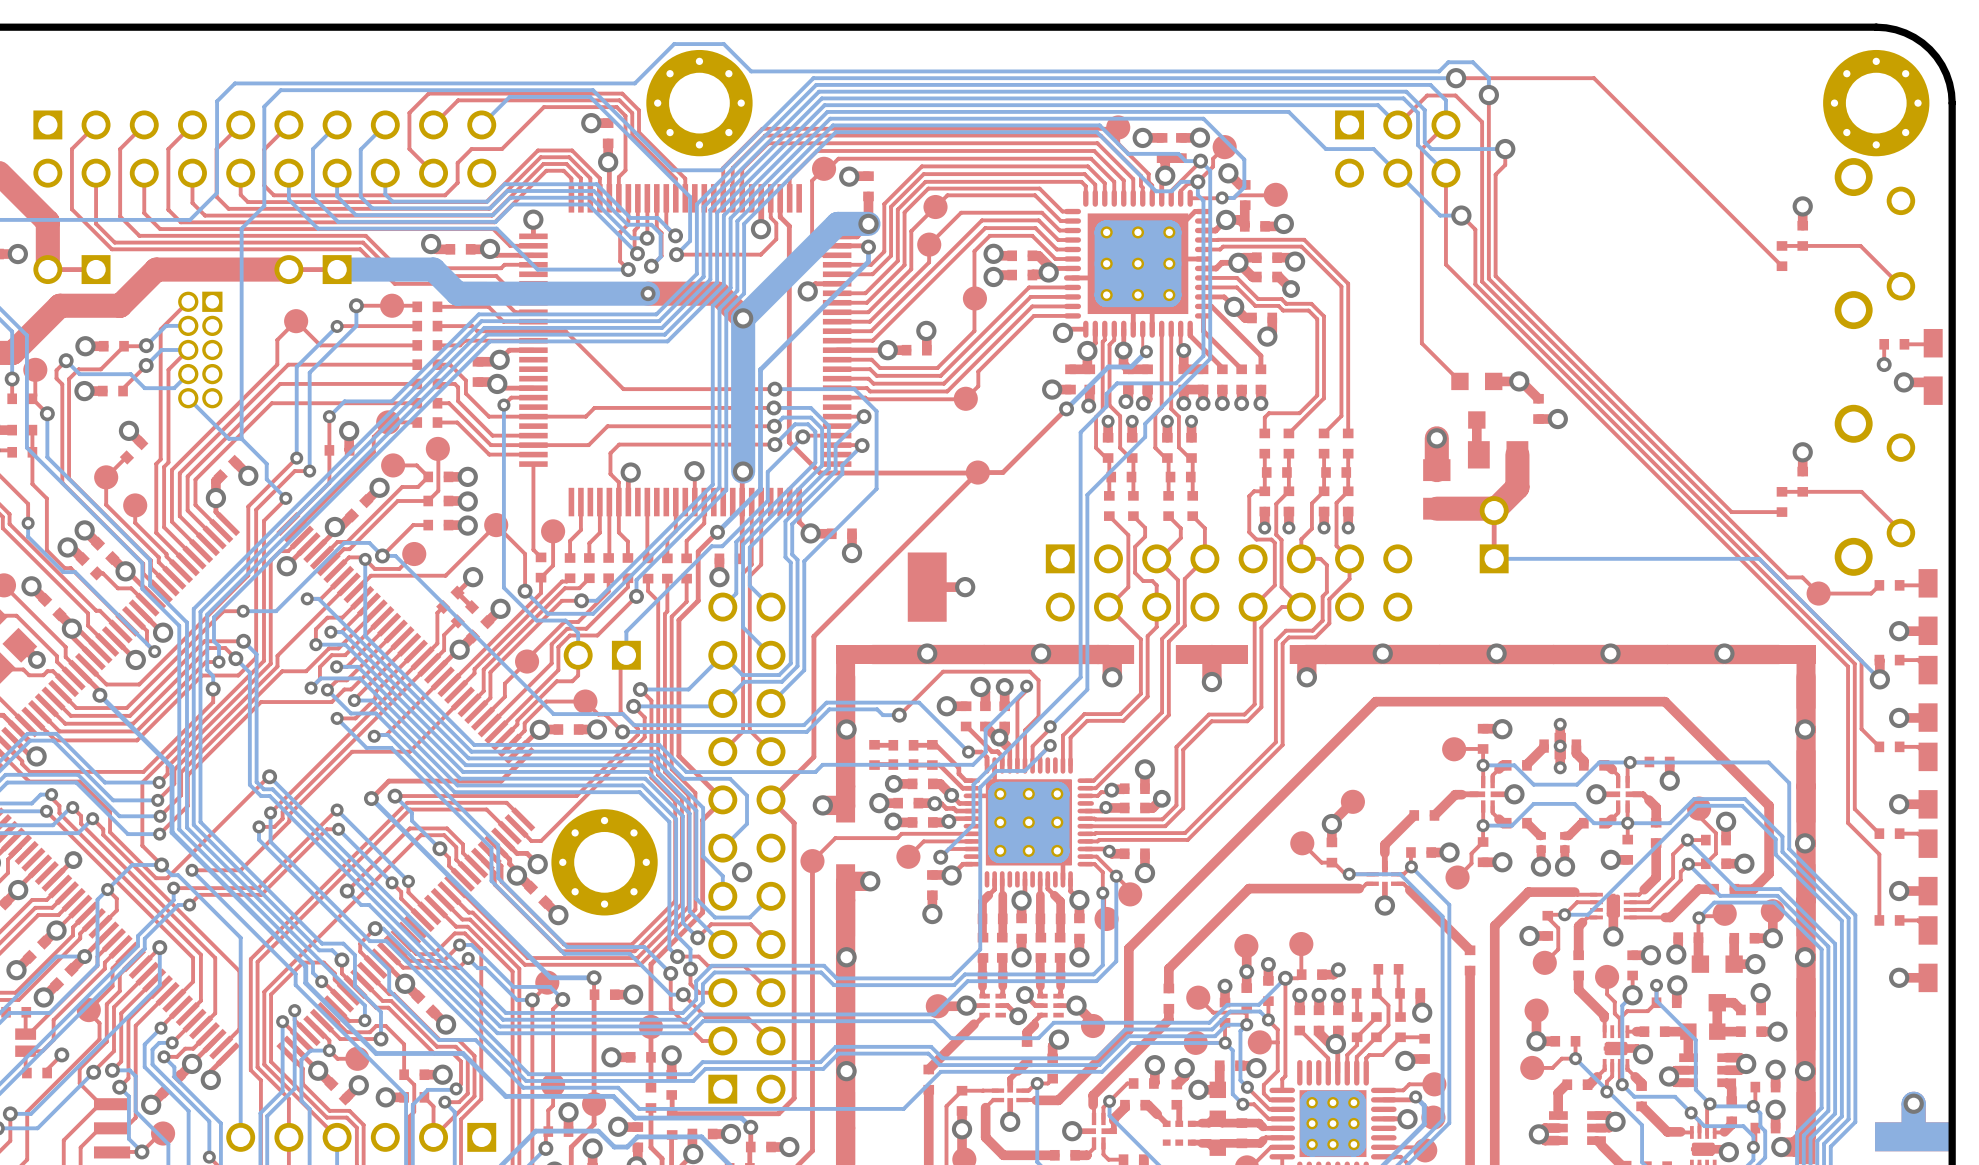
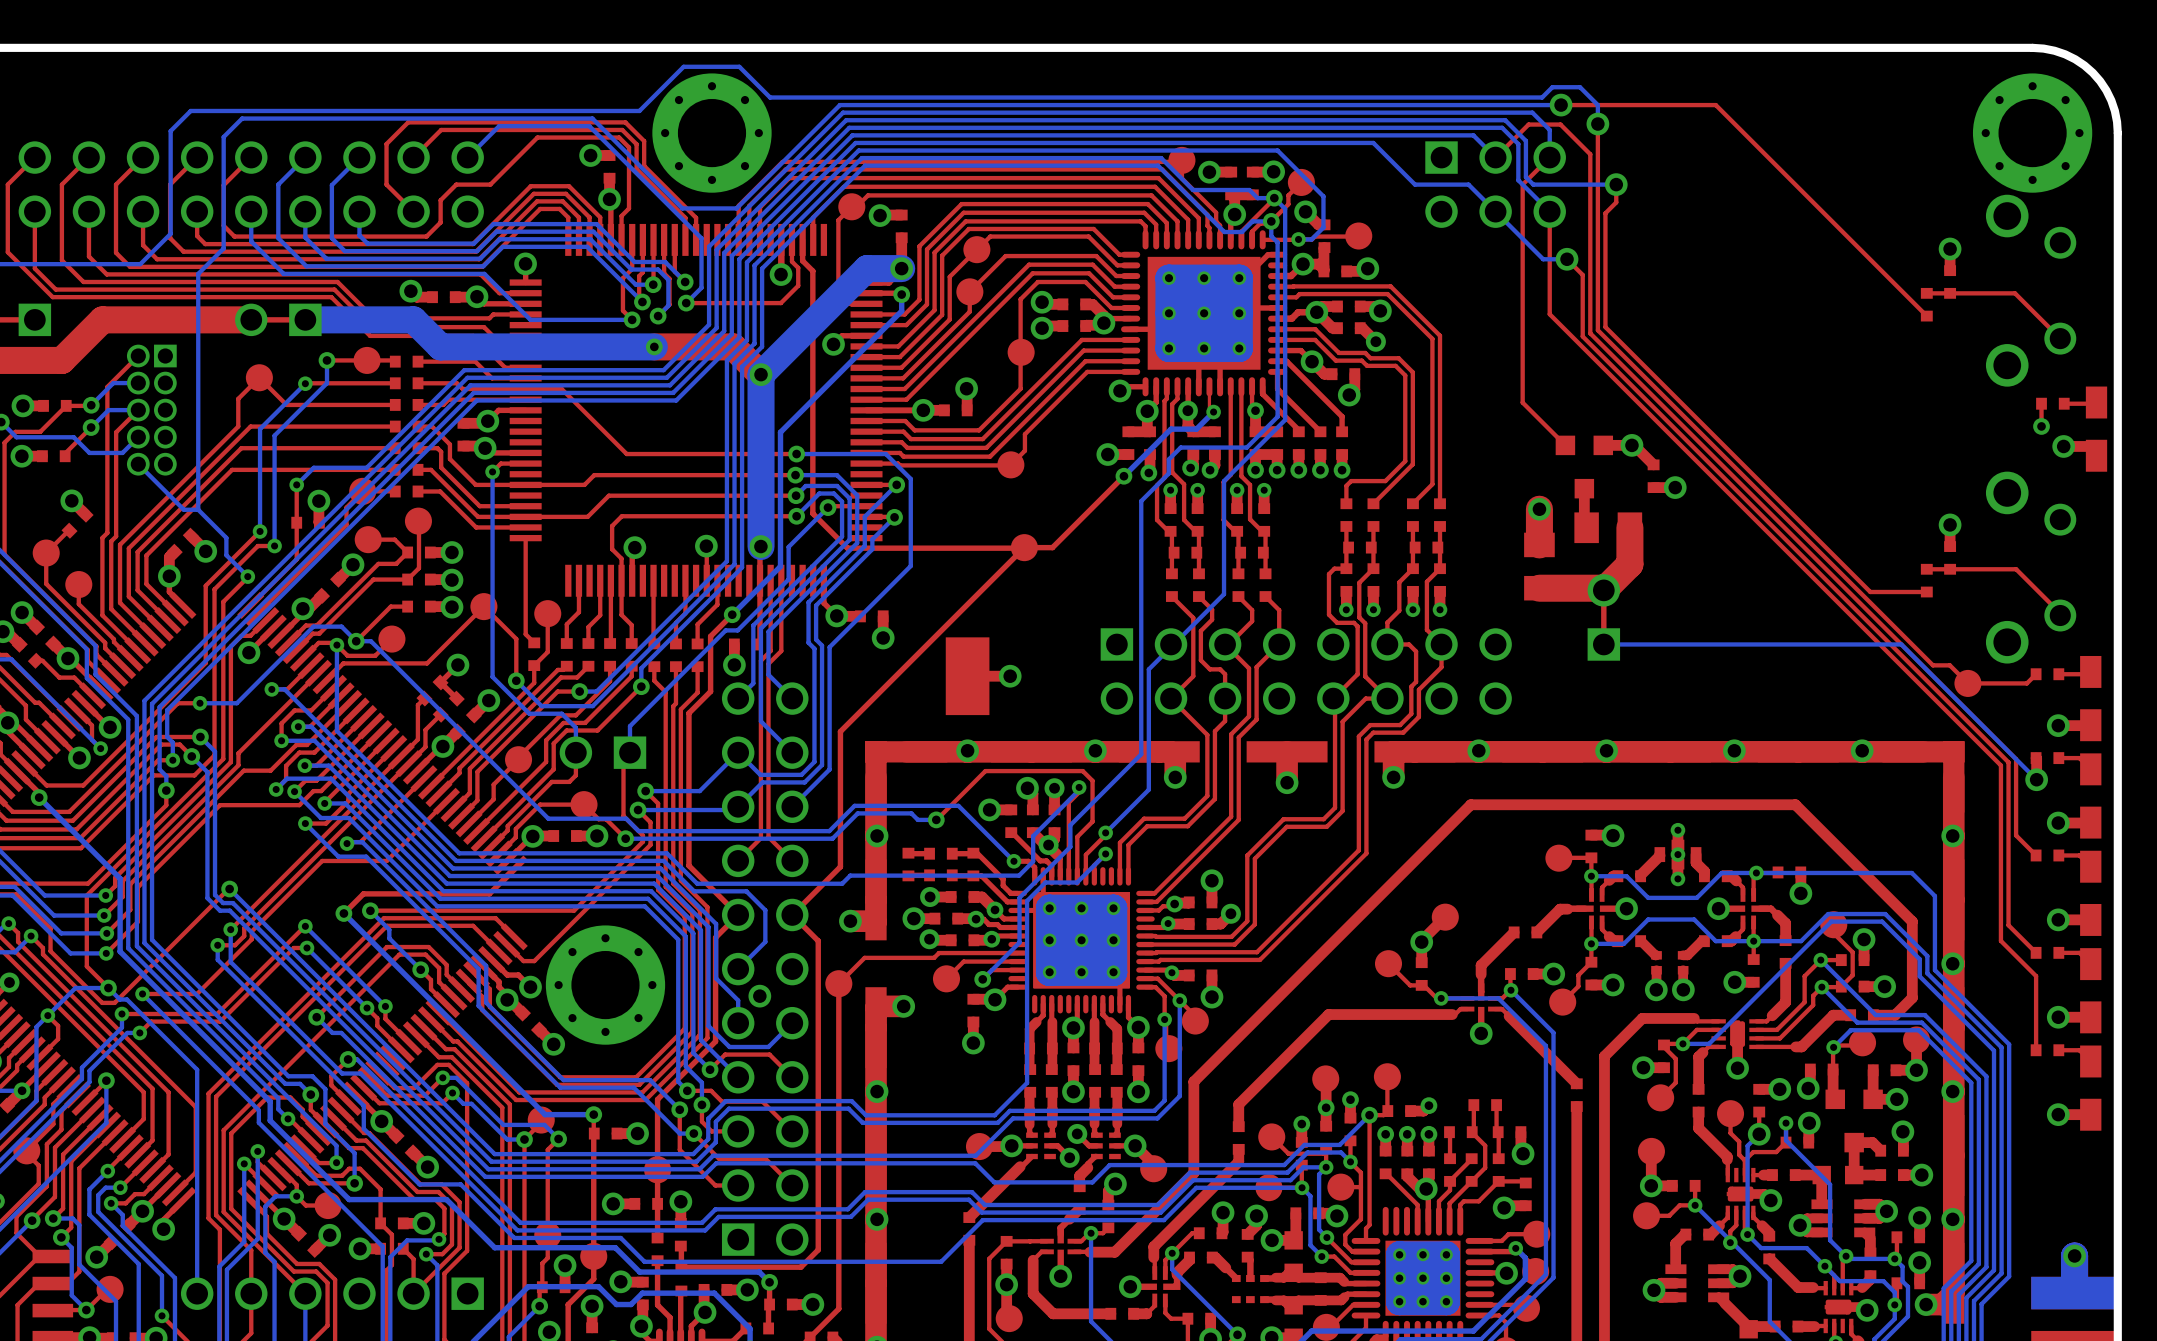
bottom track: (1155, 413) (1145, 423) (1145, 436) (1087, 494) (1087, 689) -> (1224, 481) (1224, 594) (1148, 669) (1147, 791)
bottom track: (1081, 431) (1080, 677) (1018, 739) -> (1141, 501) (1141, 754) (1070, 825) (1070, 846)

